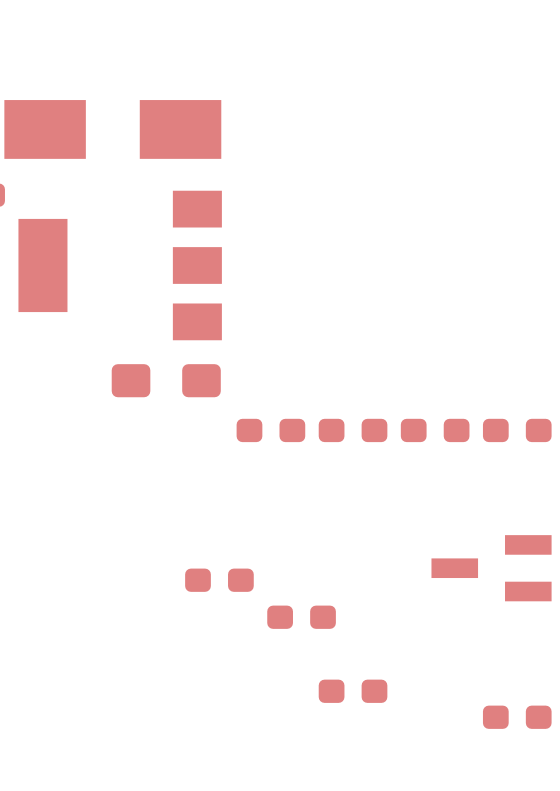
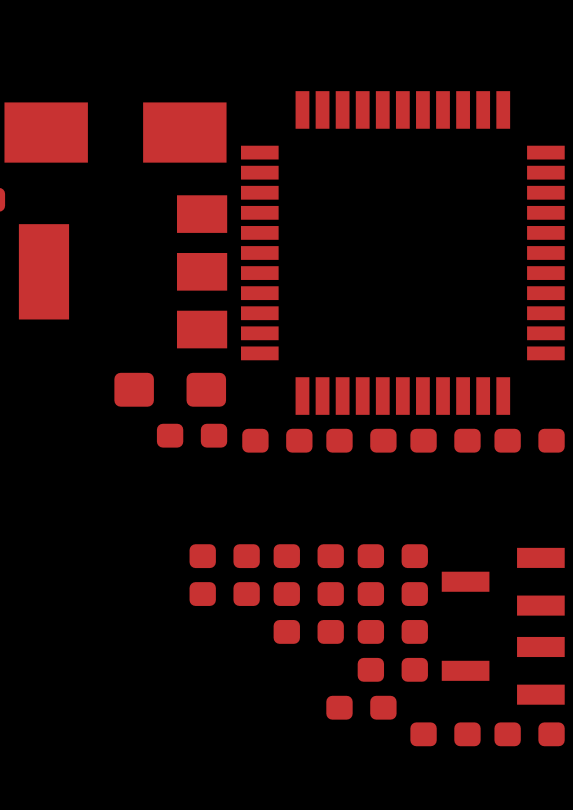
part: none -> (402, 252)
part: none -> (192, 435)
part: none -> (224, 556)
part: none -> (308, 556)
part: none -> (392, 556)
part: none -> (308, 594)
part: none -> (392, 594)
part: none -> (392, 631)
part: none -> (392, 669)
part: none -> (503, 670)
part: none -> (445, 734)

